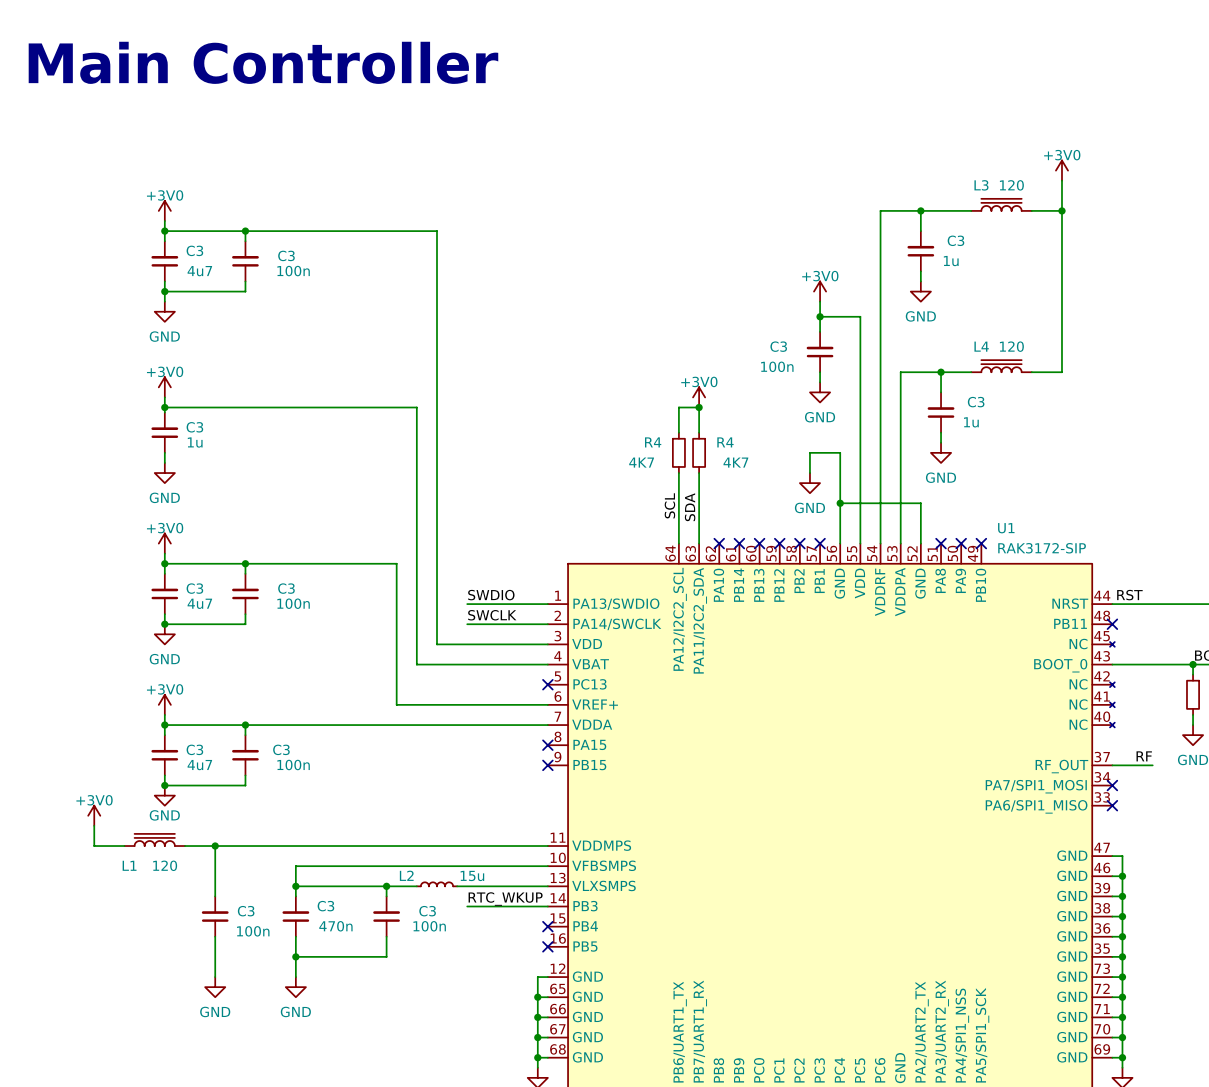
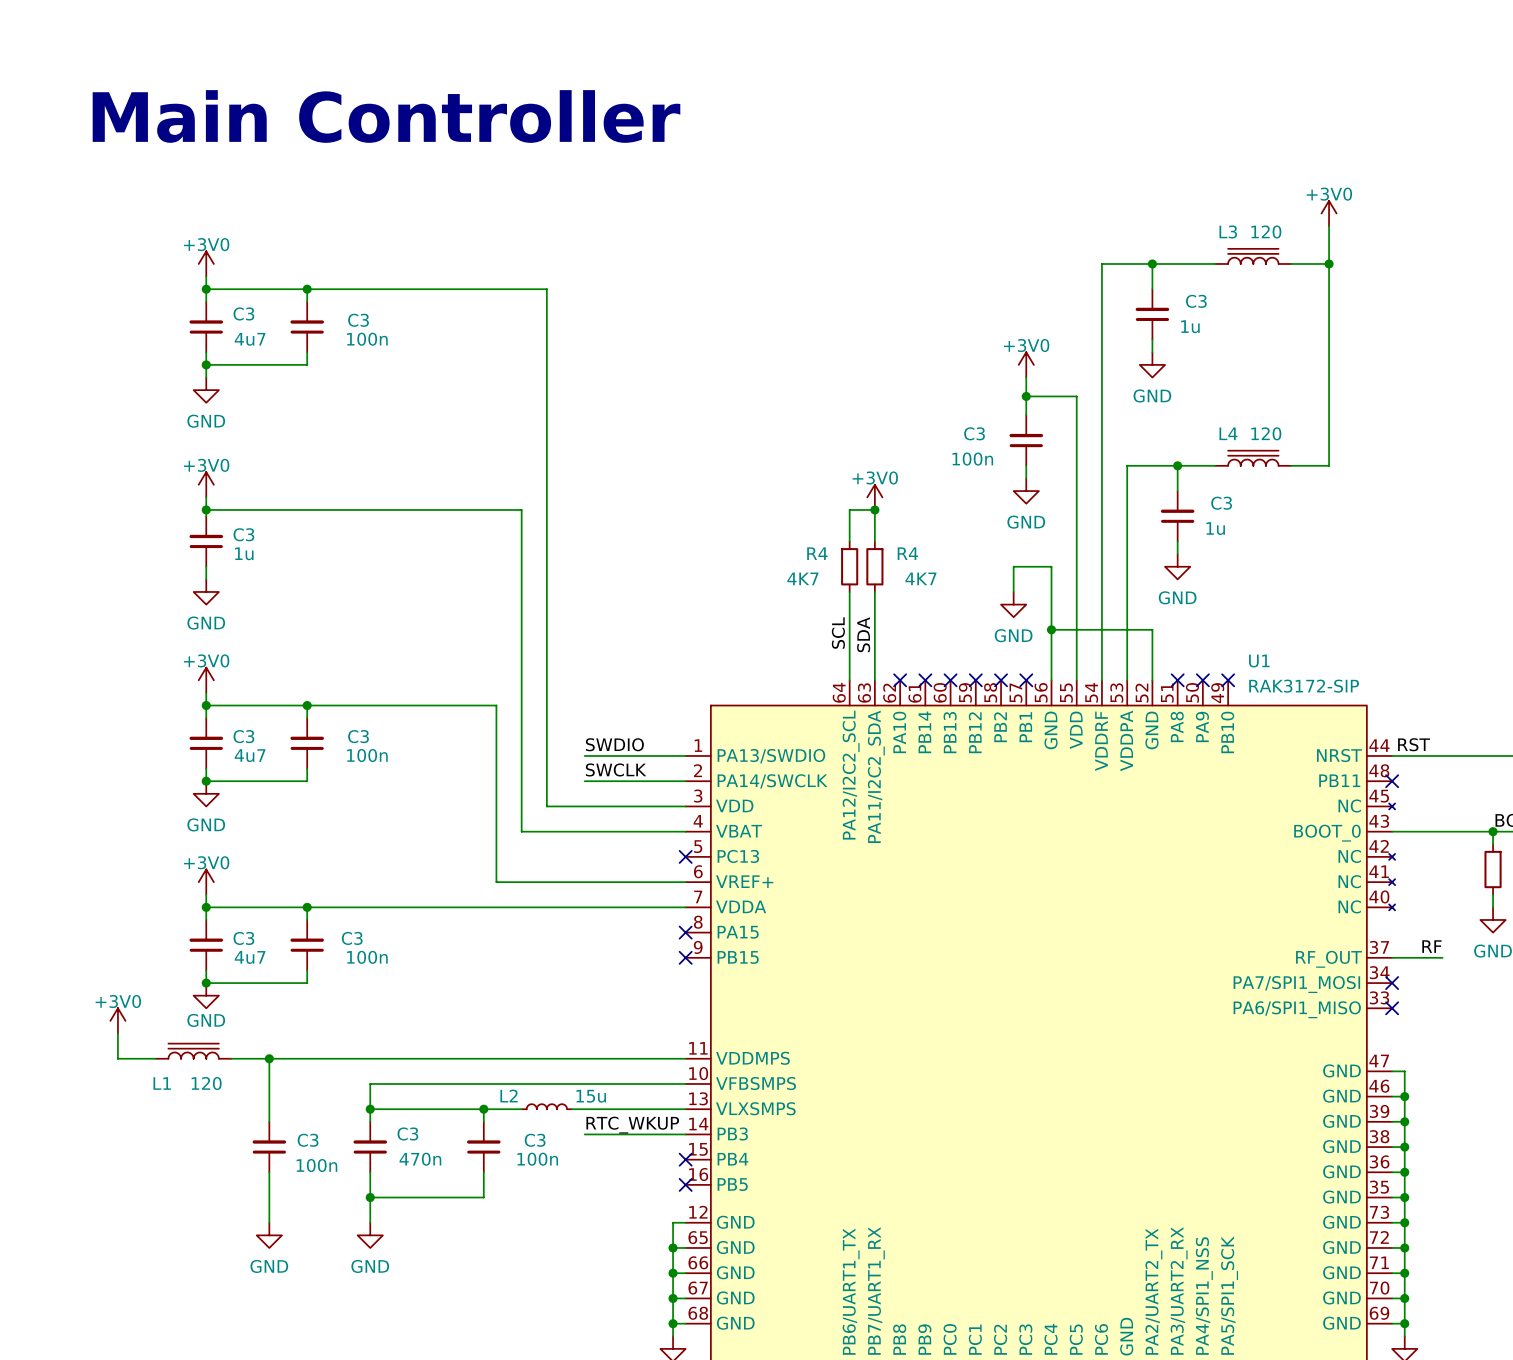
text position: Main Controller (263, 62) -> Main Controller (386, 116)

